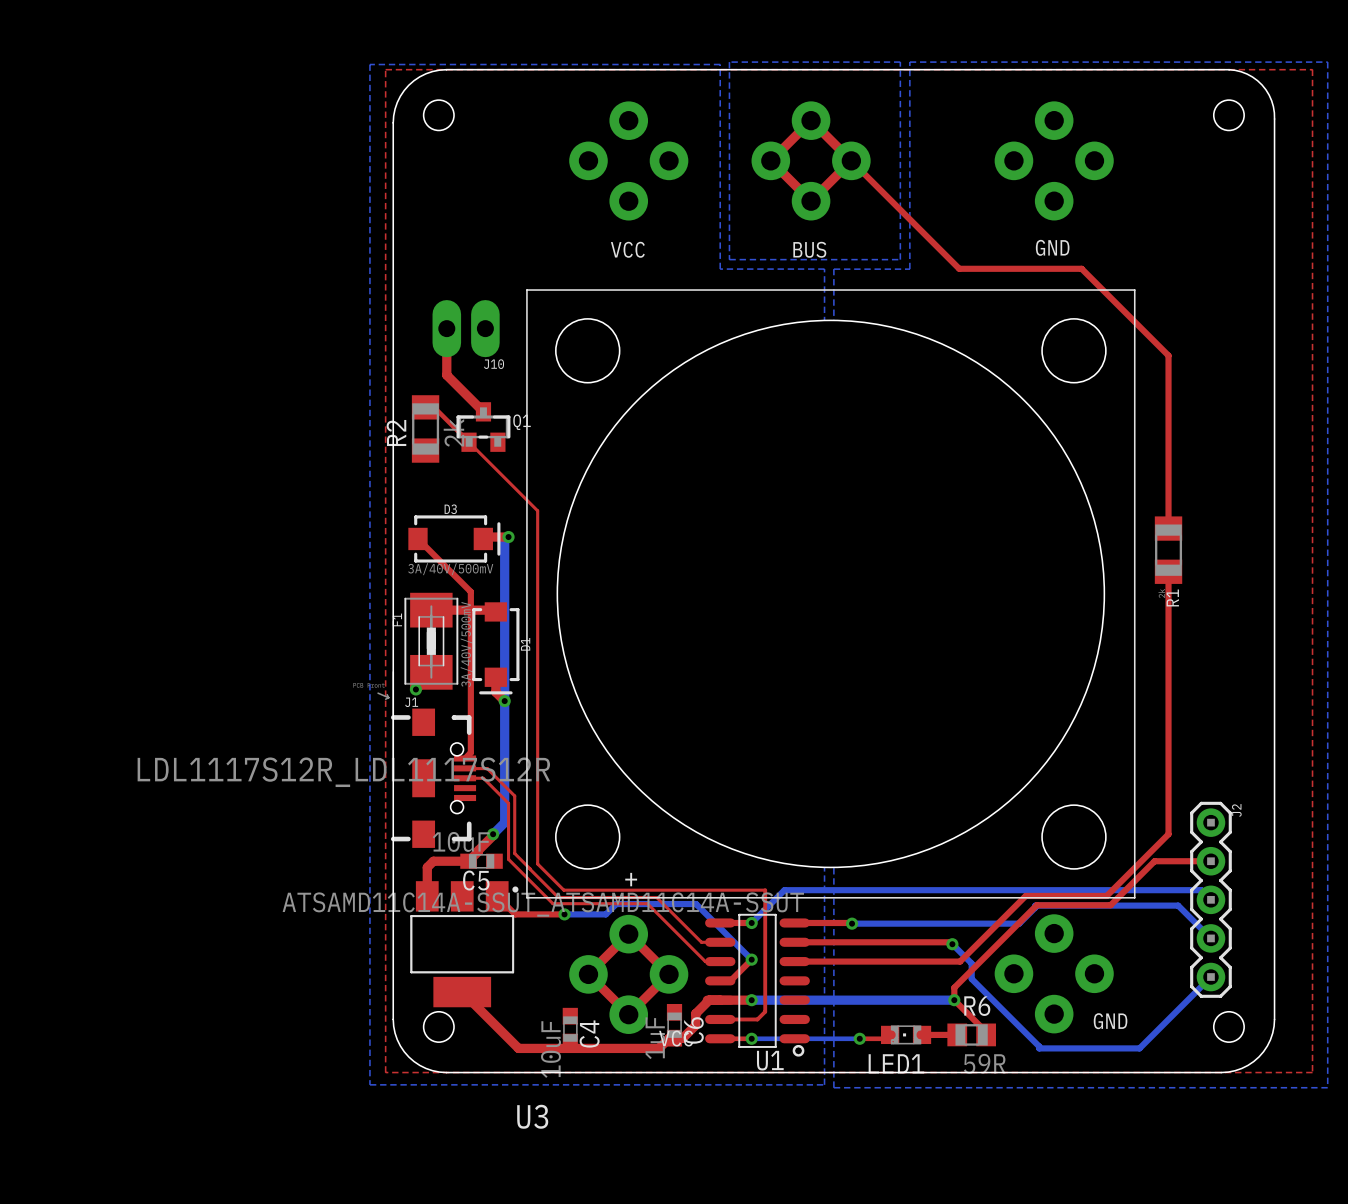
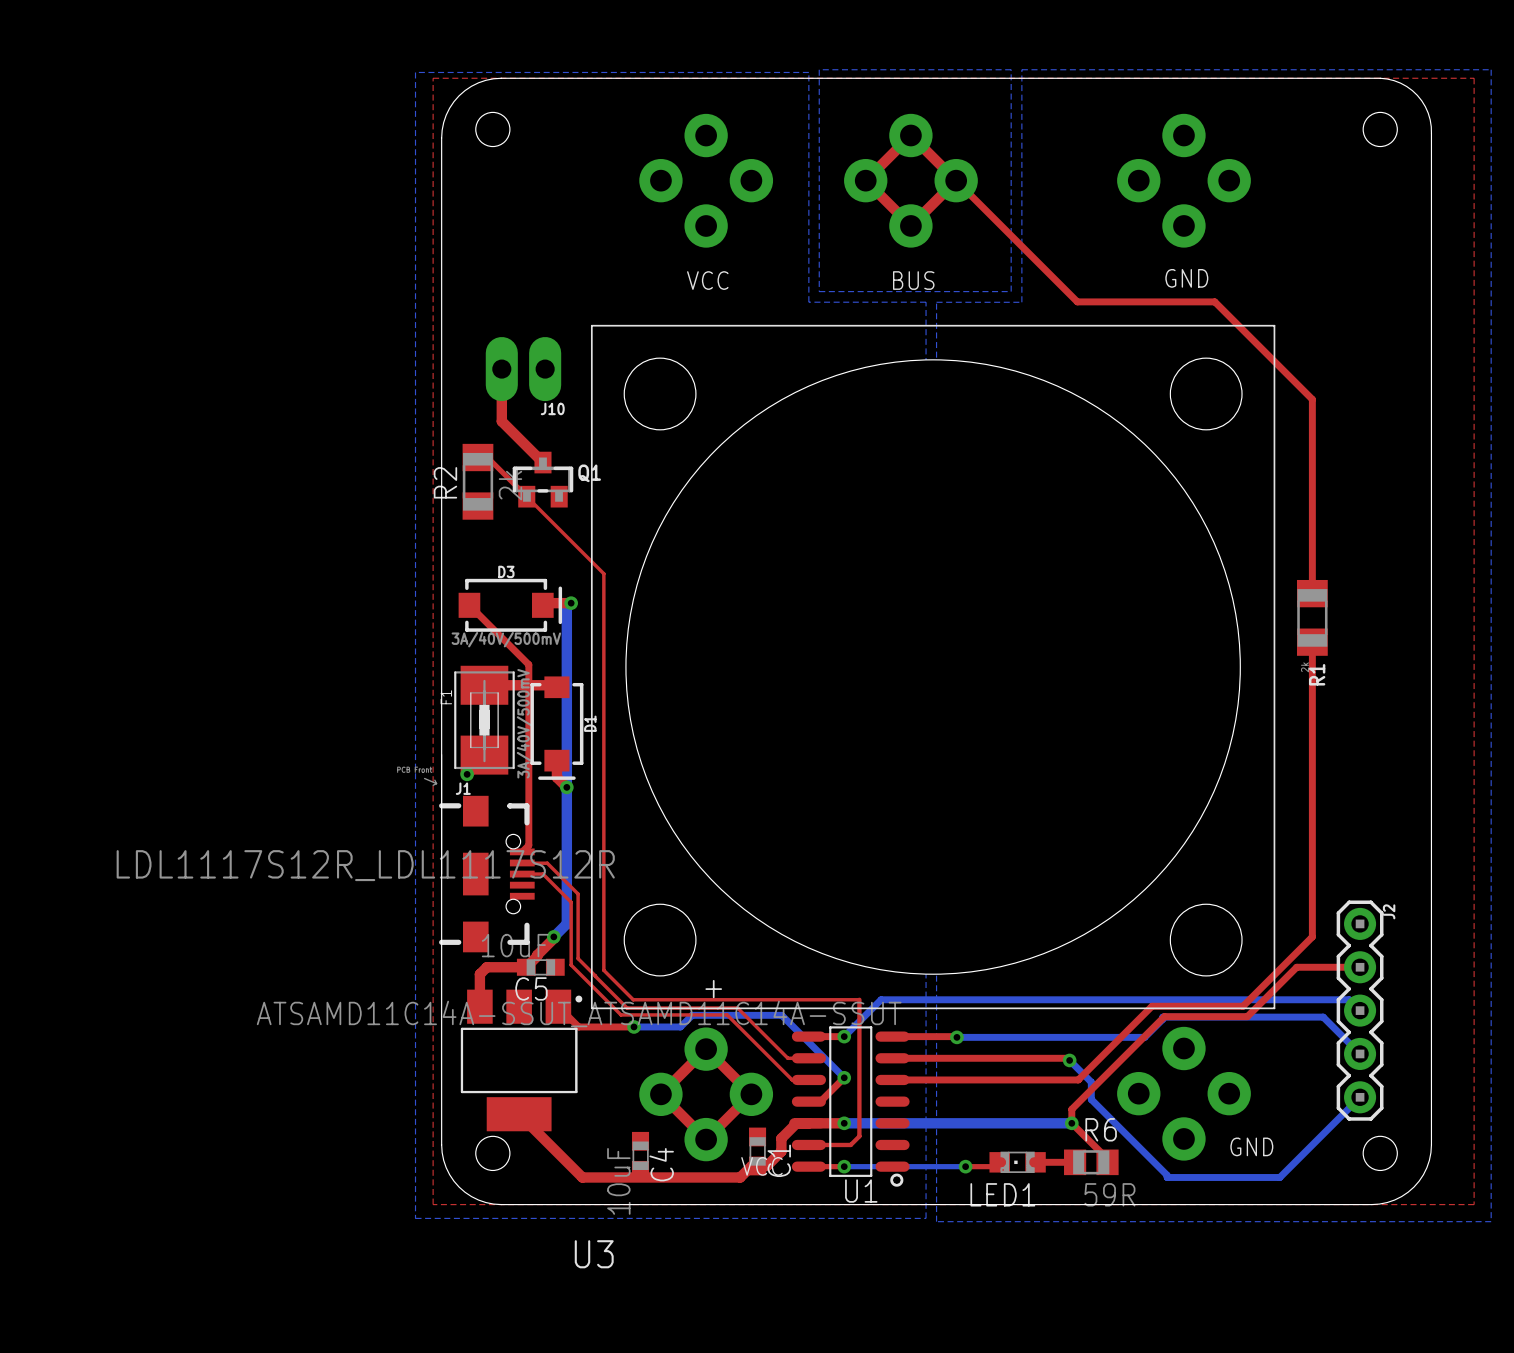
C6 name: C6 (693, 1030) -> C1 (779, 1160)
C6 value: 1uF (655, 1038) -> none

